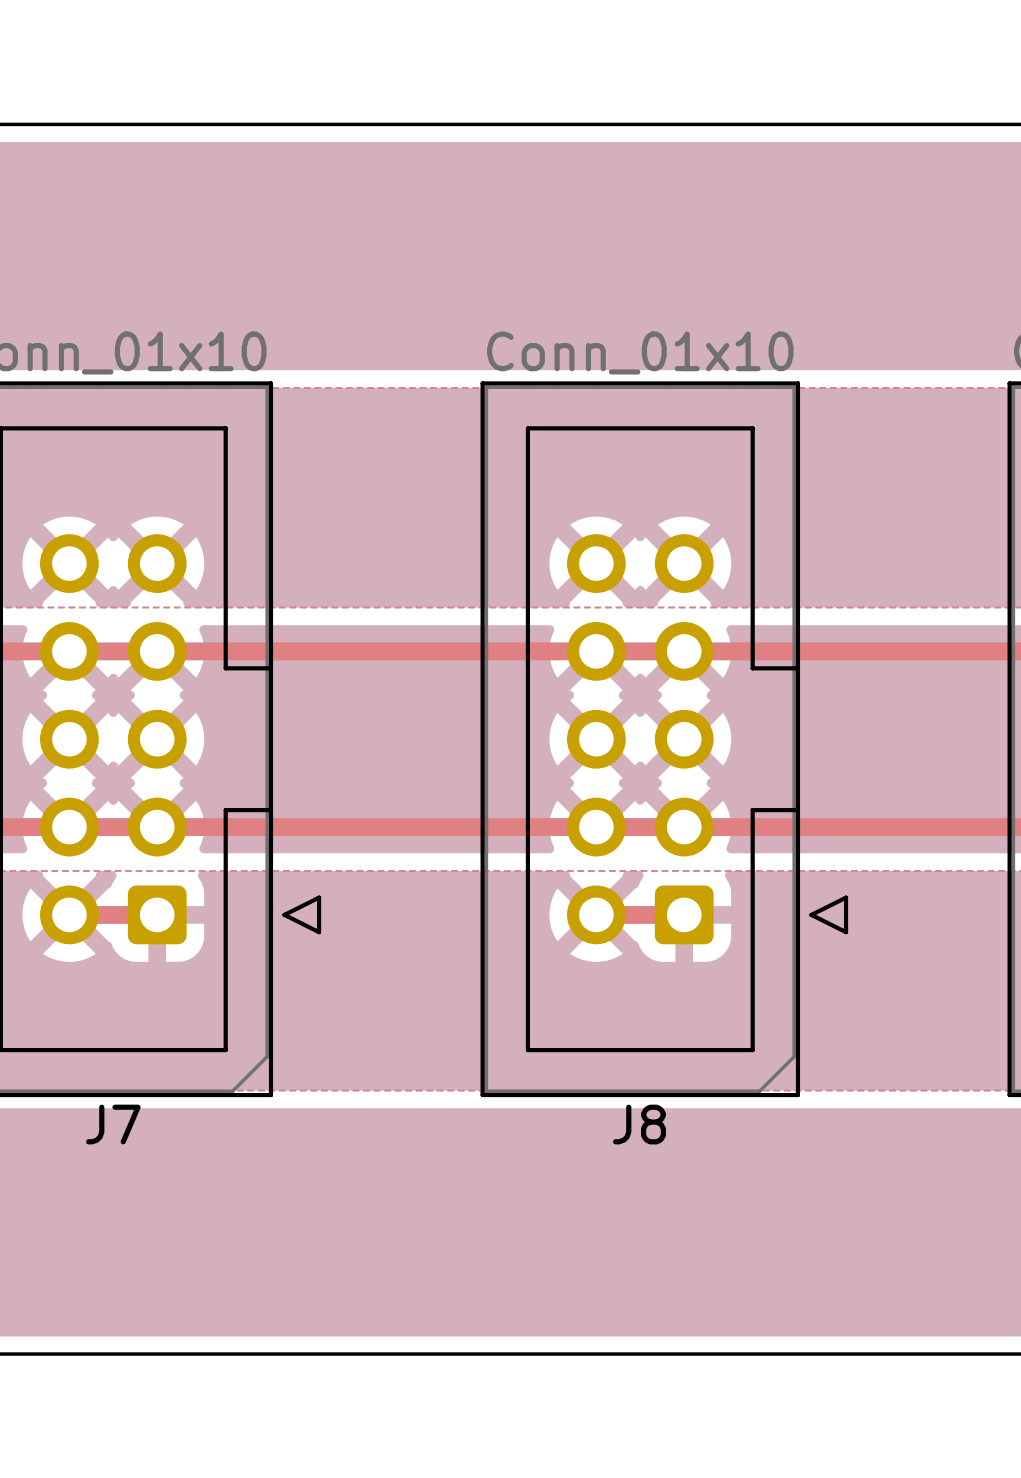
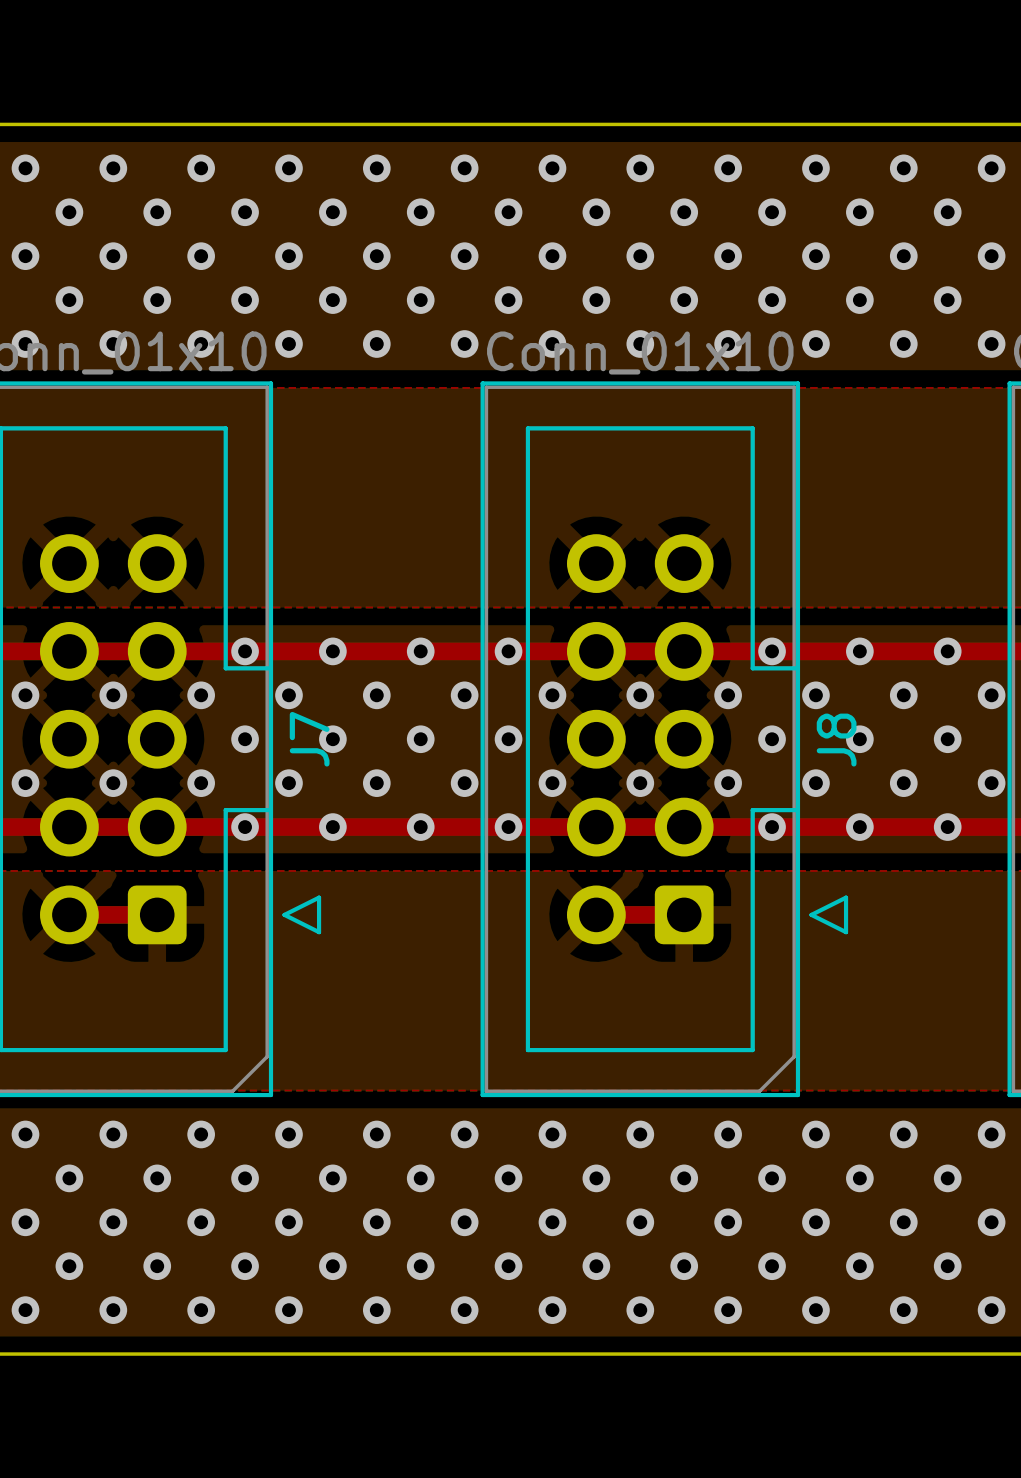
via: none -> (25, 168)
via: none -> (113, 168)
via: none -> (201, 168)
via: none -> (288, 168)
via: none -> (376, 168)
via: none -> (464, 168)
via: none -> (552, 168)
via: none -> (640, 168)
via: none -> (728, 168)
via: none -> (815, 168)
via: none -> (903, 168)
via: none -> (991, 168)
via: none -> (69, 212)
via: none -> (157, 212)
via: none -> (245, 212)
via: none -> (332, 212)
via: none -> (420, 212)
via: none -> (508, 212)
via: none -> (596, 212)
via: none -> (684, 212)
via: none -> (772, 212)
via: none -> (859, 212)
via: none -> (947, 212)
via: none -> (25, 256)
via: none -> (113, 256)
via: none -> (201, 256)
via: none -> (288, 256)
via: none -> (376, 256)
via: none -> (464, 256)
via: none -> (552, 256)
via: none -> (640, 256)
via: none -> (728, 256)
via: none -> (815, 256)
via: none -> (903, 256)
via: none -> (991, 256)
via: none -> (69, 300)
via: none -> (157, 300)
via: none -> (245, 300)
via: none -> (332, 300)
via: none -> (420, 300)
via: none -> (508, 300)
via: none -> (596, 300)
via: none -> (684, 300)
via: none -> (772, 300)
via: none -> (859, 300)
via: none -> (947, 300)
via: none -> (25, 344)
via: none -> (113, 344)
via: none -> (201, 344)
via: none -> (288, 344)
via: none -> (376, 344)
via: none -> (464, 344)
via: none -> (552, 344)
via: none -> (640, 344)
via: none -> (728, 344)
via: none -> (815, 344)
via: none -> (903, 344)
via: none -> (991, 344)
via: none -> (245, 651)
via: none -> (332, 651)
via: none -> (420, 651)
via: none -> (508, 651)
via: none -> (772, 651)
via: none -> (859, 651)
via: none -> (947, 651)
via: none -> (25, 695)
via: none -> (113, 695)
via: none -> (201, 695)
via: none -> (288, 695)
via: none -> (376, 695)
via: none -> (464, 695)
via: none -> (552, 695)
via: none -> (640, 695)
via: none -> (728, 695)
via: none -> (815, 695)
via: none -> (903, 695)
via: none -> (991, 695)
via: none -> (245, 739)
via: none -> (332, 739)
via: none -> (420, 739)
via: none -> (508, 739)
via: none -> (772, 739)
via: none -> (859, 739)
via: none -> (947, 739)
via: none -> (25, 783)
via: none -> (113, 783)
via: none -> (201, 783)
via: none -> (288, 783)
via: none -> (376, 783)
via: none -> (464, 783)
via: none -> (552, 783)
via: none -> (640, 783)
via: none -> (728, 783)
via: none -> (815, 783)
via: none -> (903, 783)
via: none -> (991, 783)
via: none -> (245, 827)
via: none -> (332, 827)
via: none -> (420, 827)
via: none -> (508, 827)
via: none -> (772, 827)
via: none -> (859, 827)
via: none -> (947, 827)
J7 name rotation: 0° (113, 1124) -> 90° counterclockwise (309, 739)
J7 name position: J7 (113, 1124) -> J7 (309, 739)
J8 name rotation: 0° (639, 1124) -> 90° counterclockwise (836, 740)
J8 name position: J8 (639, 1124) -> J8 (836, 740)
via: none -> (25, 1134)
via: none -> (113, 1134)
via: none -> (201, 1134)
via: none -> (288, 1134)
via: none -> (376, 1134)
via: none -> (464, 1134)
via: none -> (552, 1134)
via: none -> (640, 1134)
via: none -> (728, 1134)
via: none -> (815, 1134)
via: none -> (903, 1134)
via: none -> (991, 1134)
via: none -> (69, 1178)
via: none -> (157, 1178)
via: none -> (245, 1178)
via: none -> (332, 1178)
via: none -> (420, 1178)
via: none -> (508, 1178)
via: none -> (596, 1178)
via: none -> (684, 1178)
via: none -> (772, 1178)
via: none -> (859, 1178)
via: none -> (947, 1178)
via: none -> (25, 1222)
via: none -> (113, 1222)
via: none -> (201, 1222)
via: none -> (288, 1222)
via: none -> (376, 1222)
via: none -> (464, 1222)
via: none -> (552, 1222)
via: none -> (640, 1222)
via: none -> (728, 1222)
via: none -> (815, 1222)
via: none -> (903, 1222)
via: none -> (991, 1222)
via: none -> (69, 1266)
via: none -> (157, 1266)
via: none -> (245, 1266)
via: none -> (332, 1266)
via: none -> (420, 1266)
via: none -> (508, 1266)
via: none -> (596, 1266)
via: none -> (684, 1266)
via: none -> (772, 1266)
via: none -> (859, 1266)
via: none -> (947, 1266)
via: none -> (25, 1310)
via: none -> (113, 1310)
via: none -> (201, 1310)
via: none -> (288, 1310)
via: none -> (376, 1310)
via: none -> (464, 1310)
via: none -> (552, 1310)
via: none -> (640, 1310)
via: none -> (728, 1310)
via: none -> (815, 1310)
via: none -> (903, 1310)
via: none -> (991, 1310)

